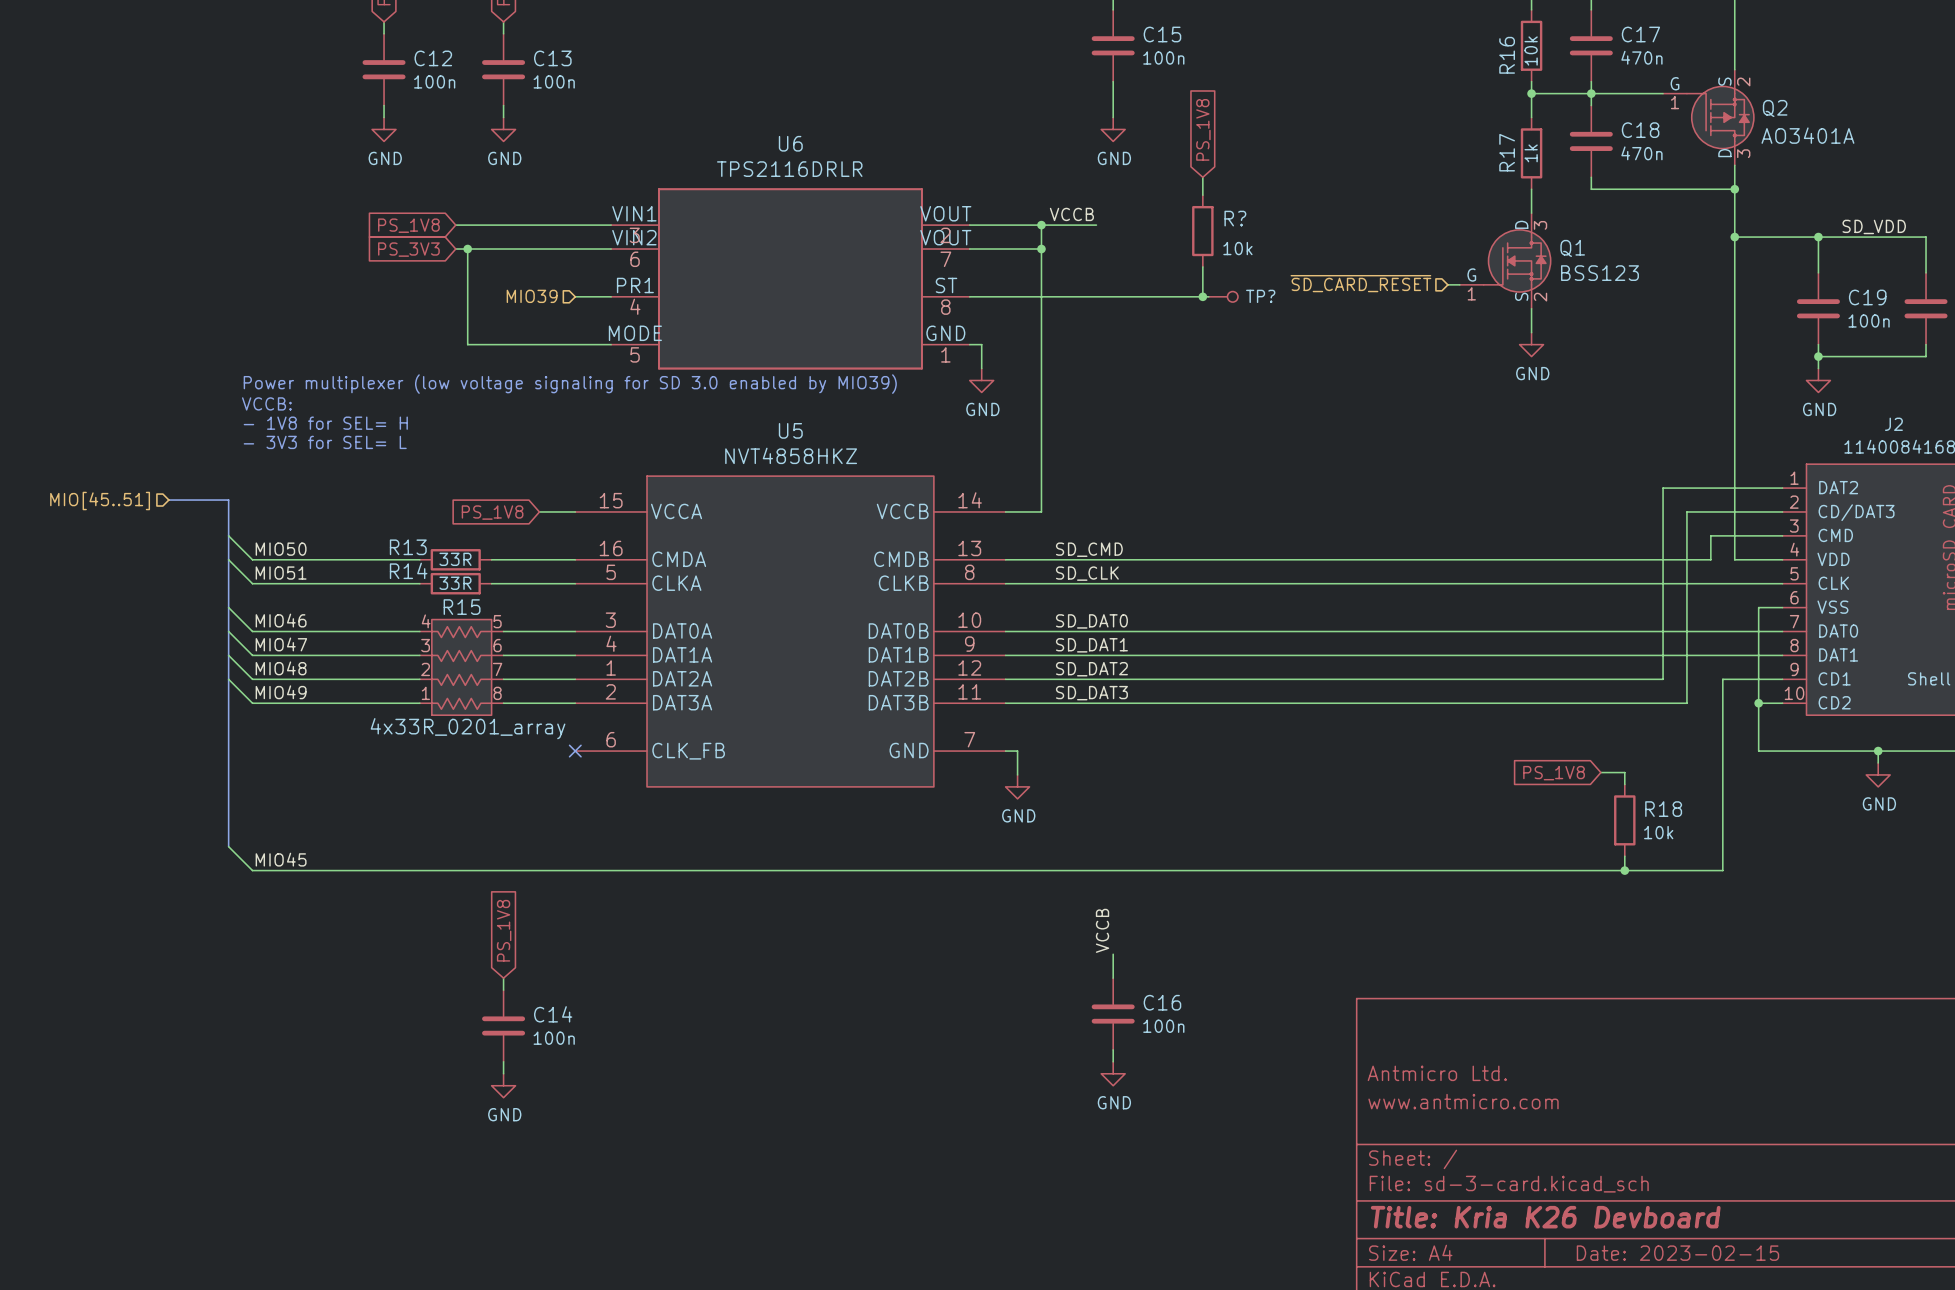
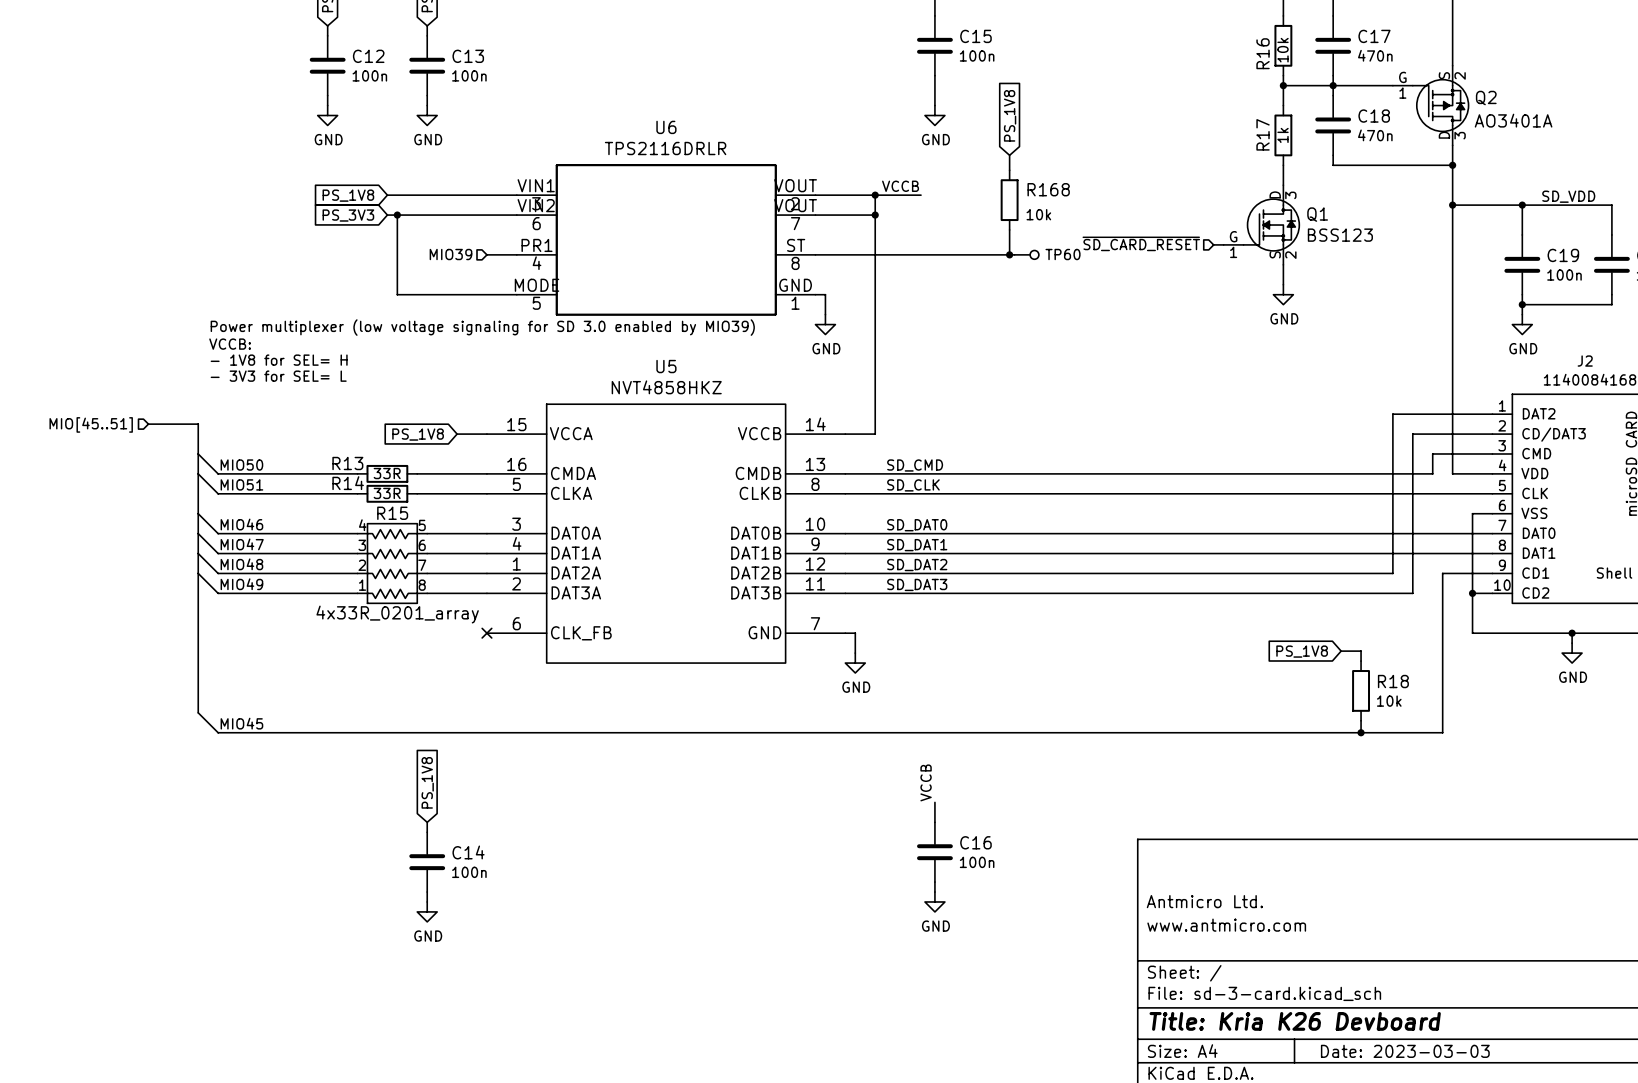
R? name: R? (1235, 218) -> R168 (1048, 189)
TP? name: TP? (1260, 296) -> TP60 (1063, 254)
title block: Date: 2023-02-15 (1677, 1253) -> Date: 2023-03-03 (1405, 1051)

